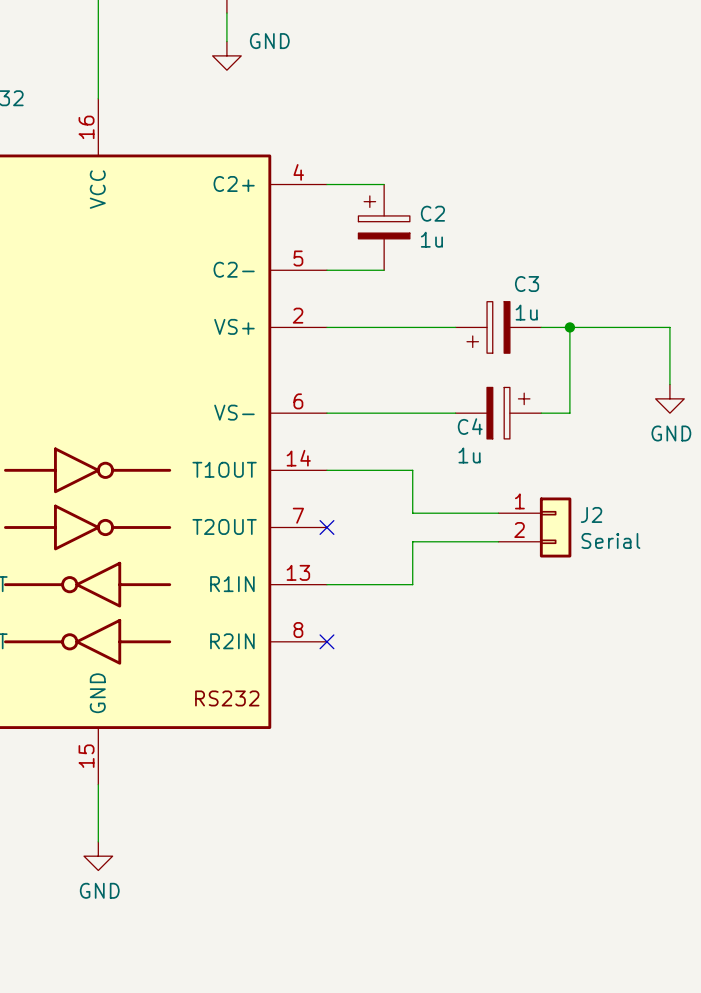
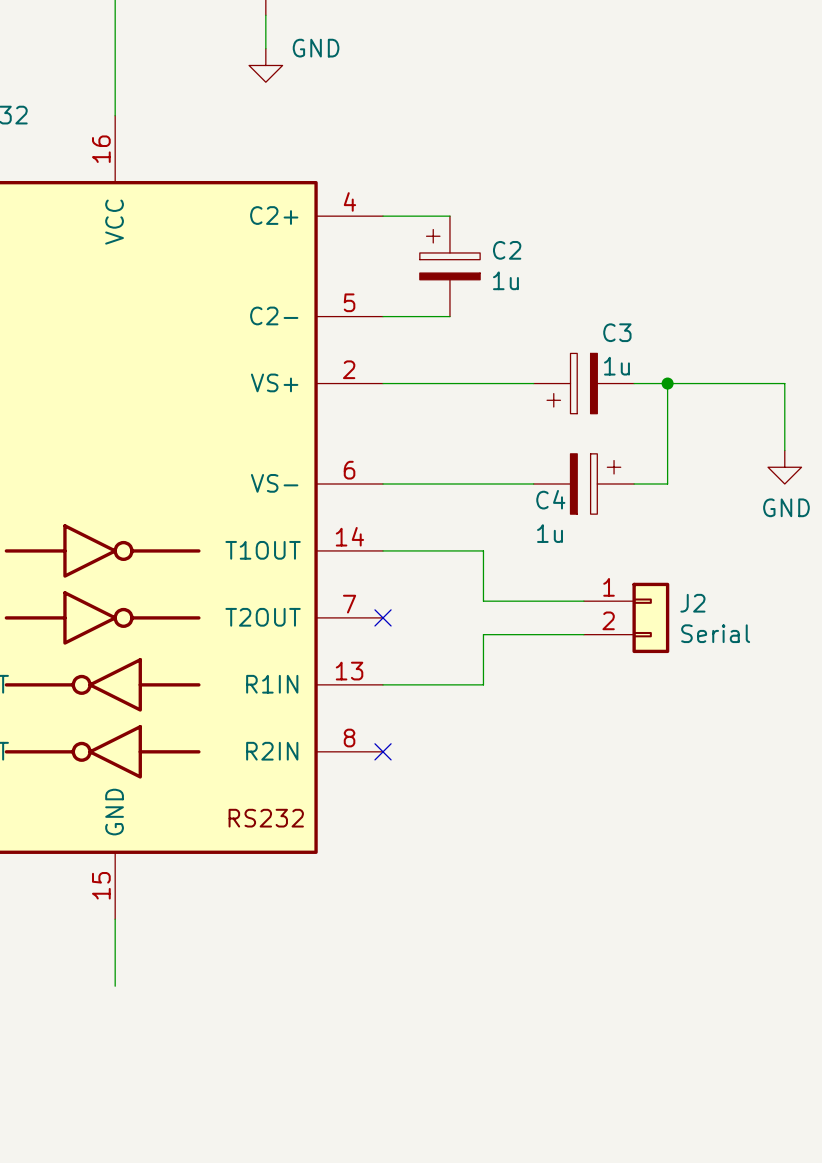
power symbol: GND (98, 856) -> none

